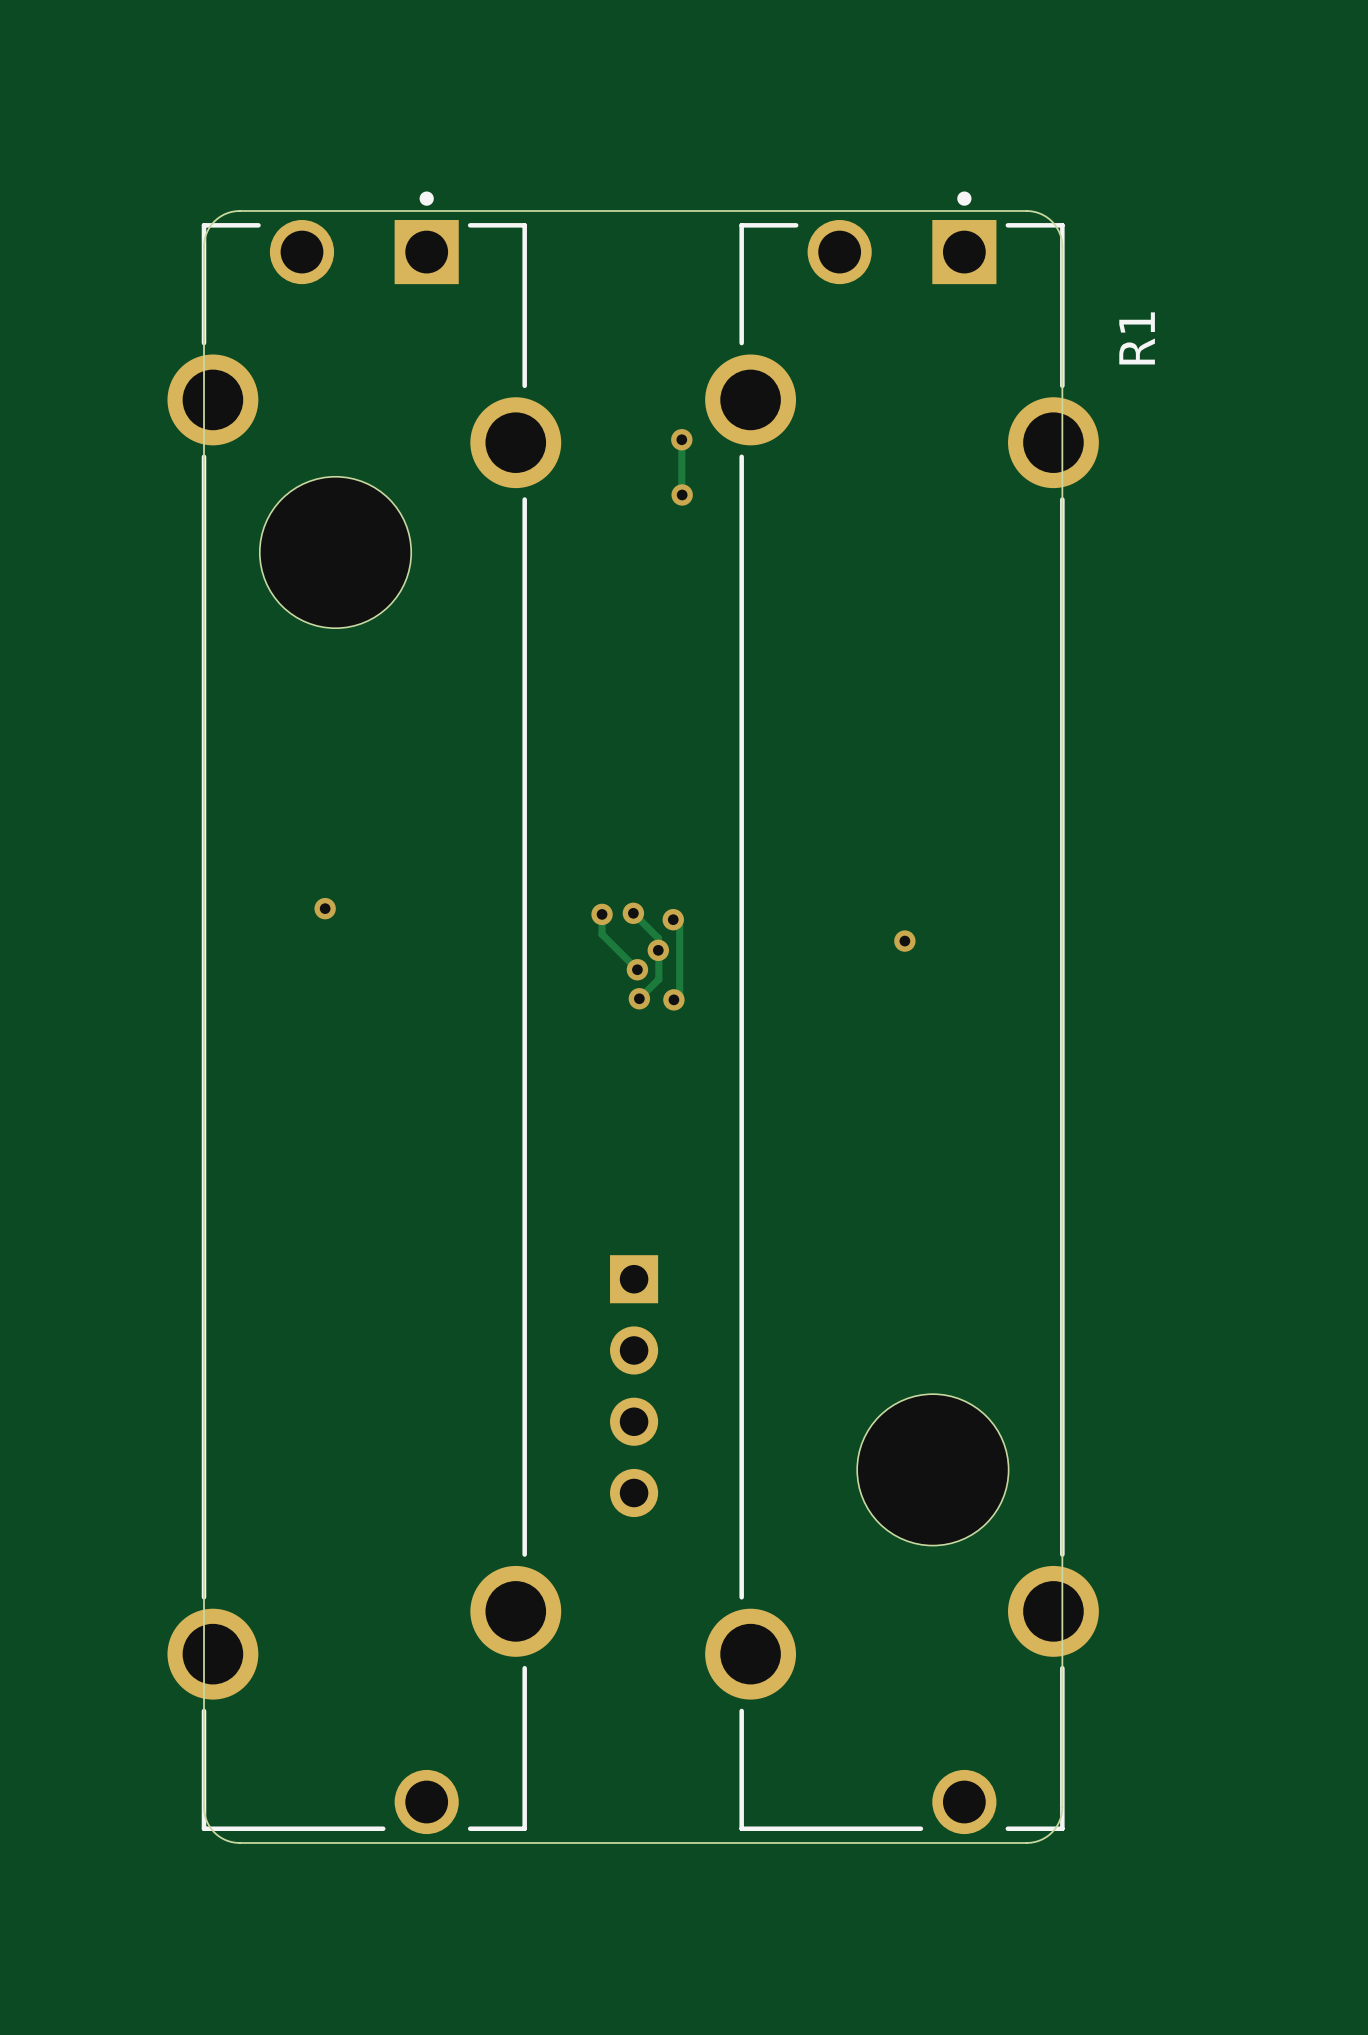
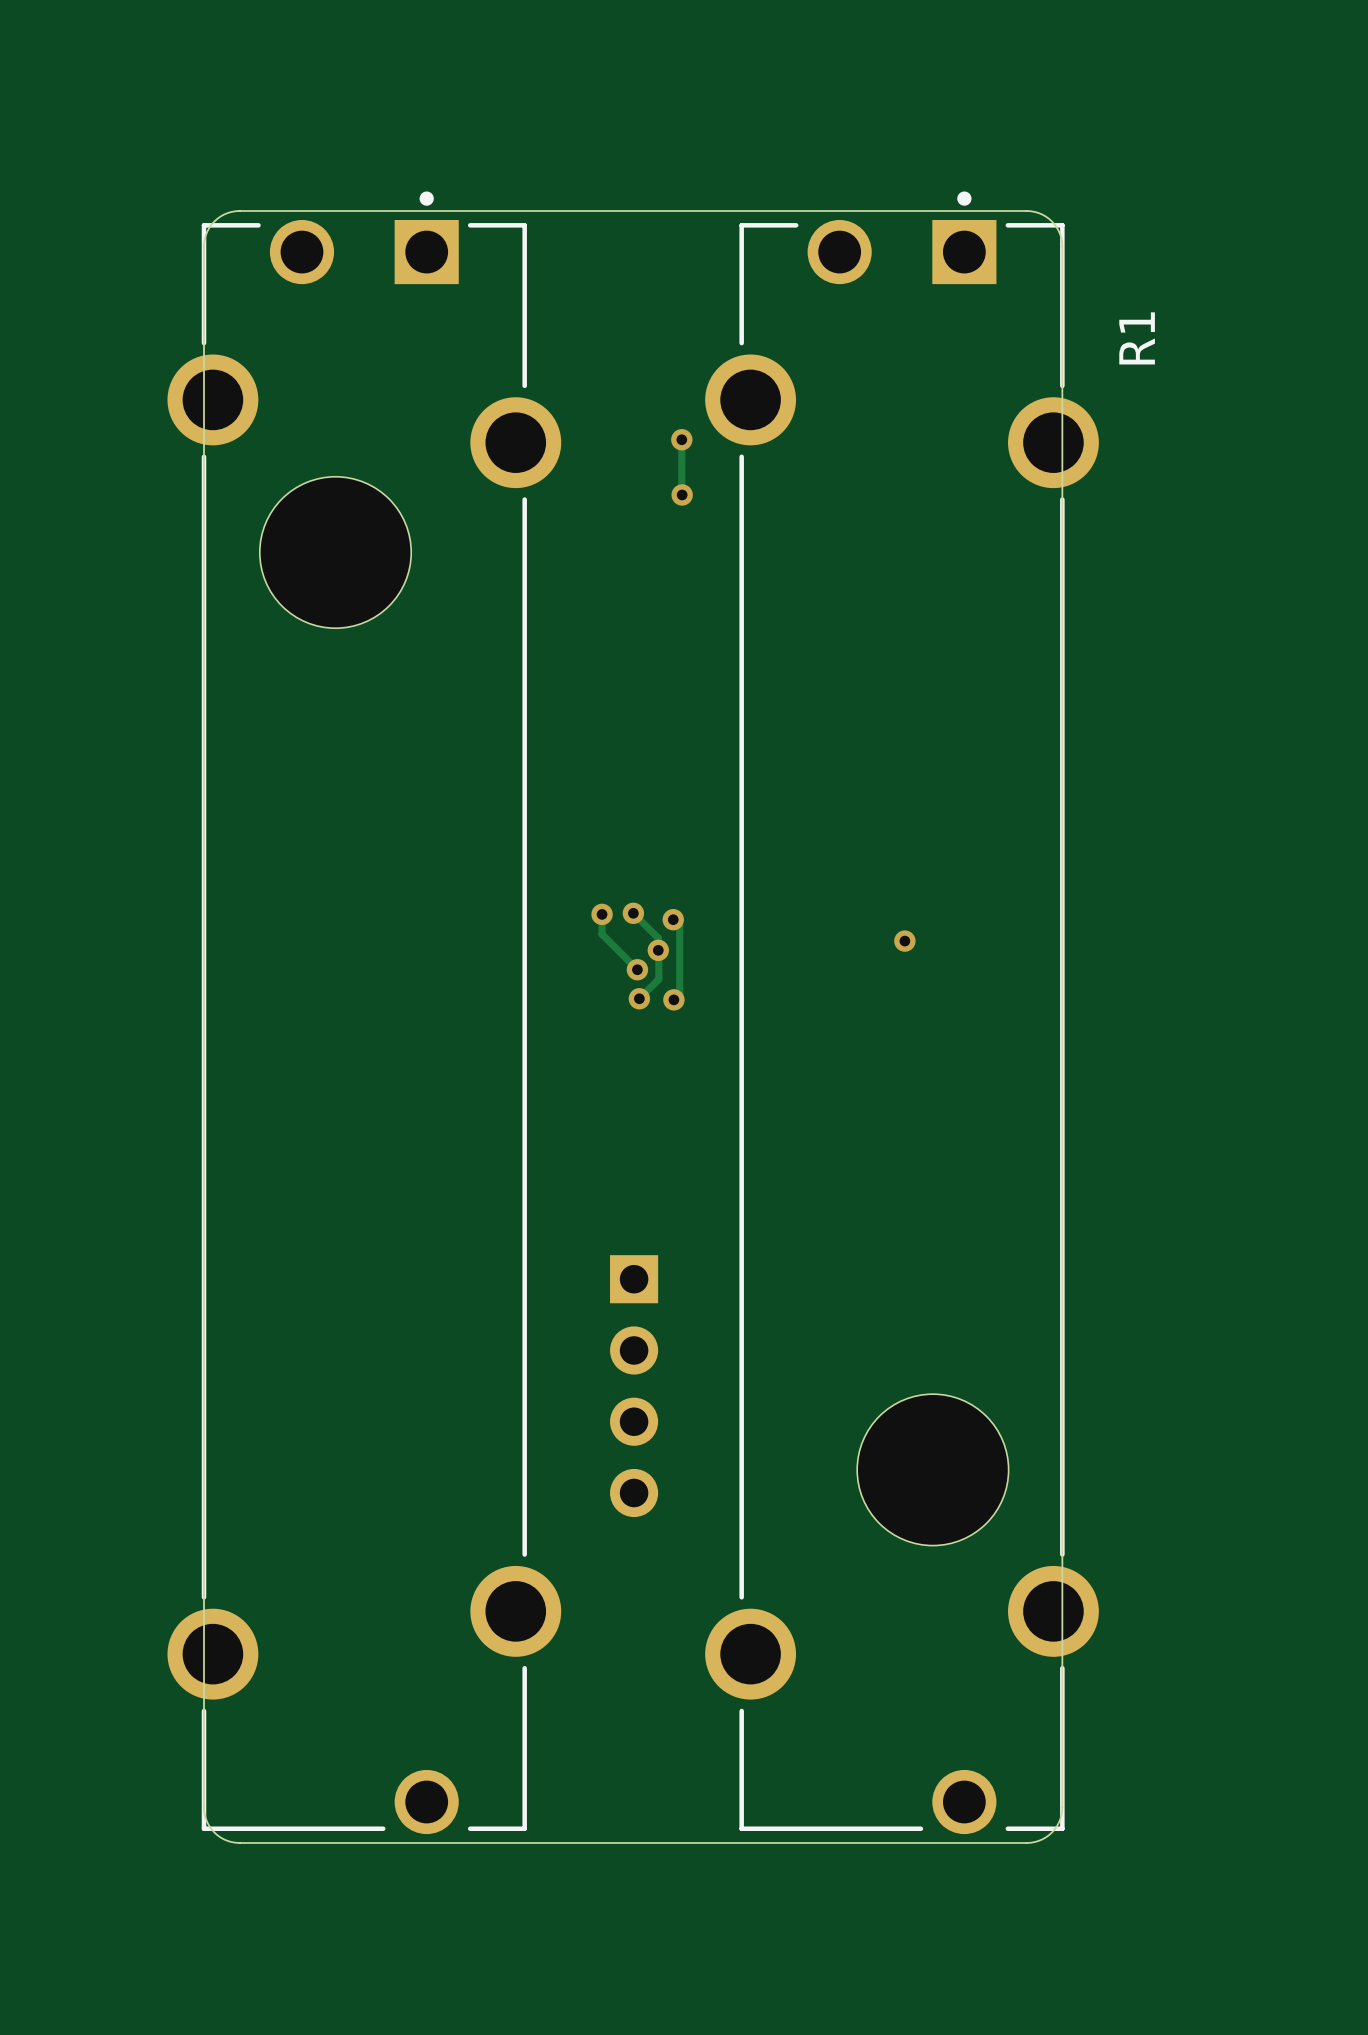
via: (325, 908) -> none

